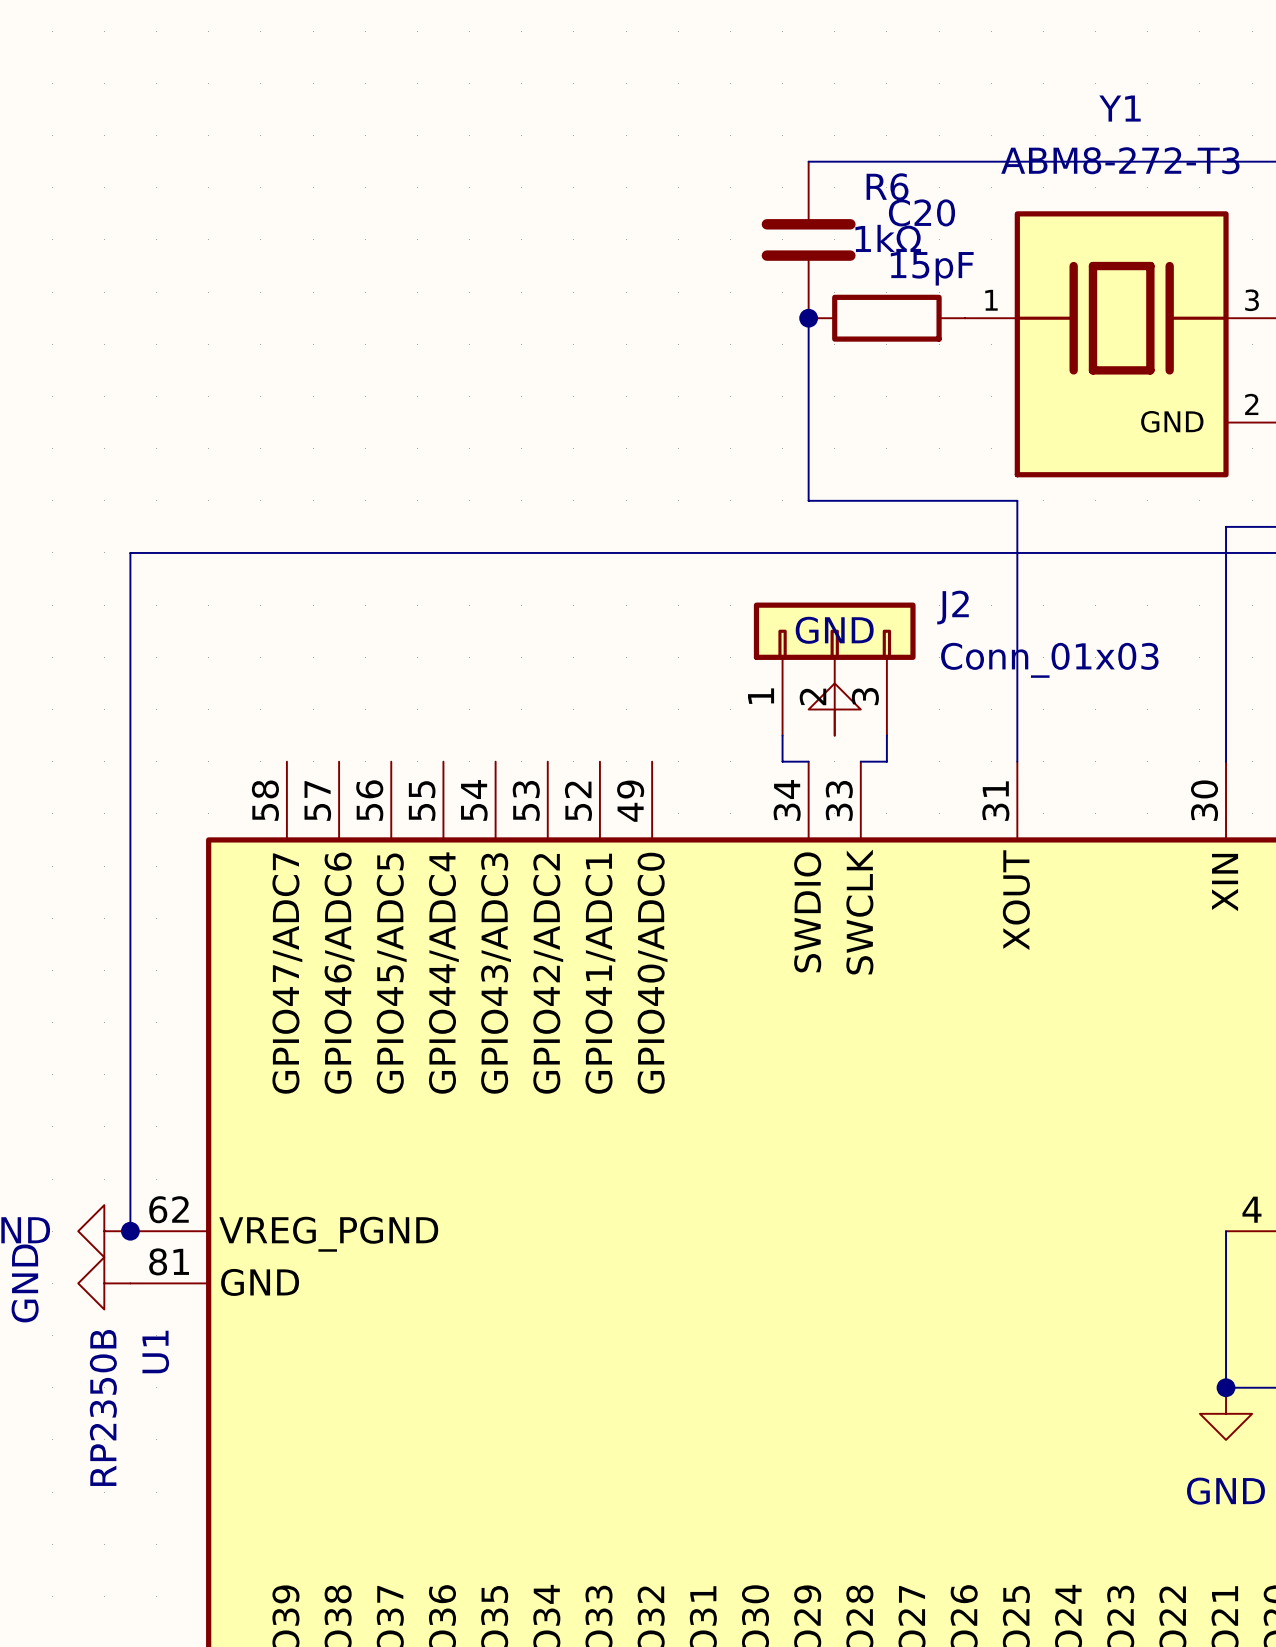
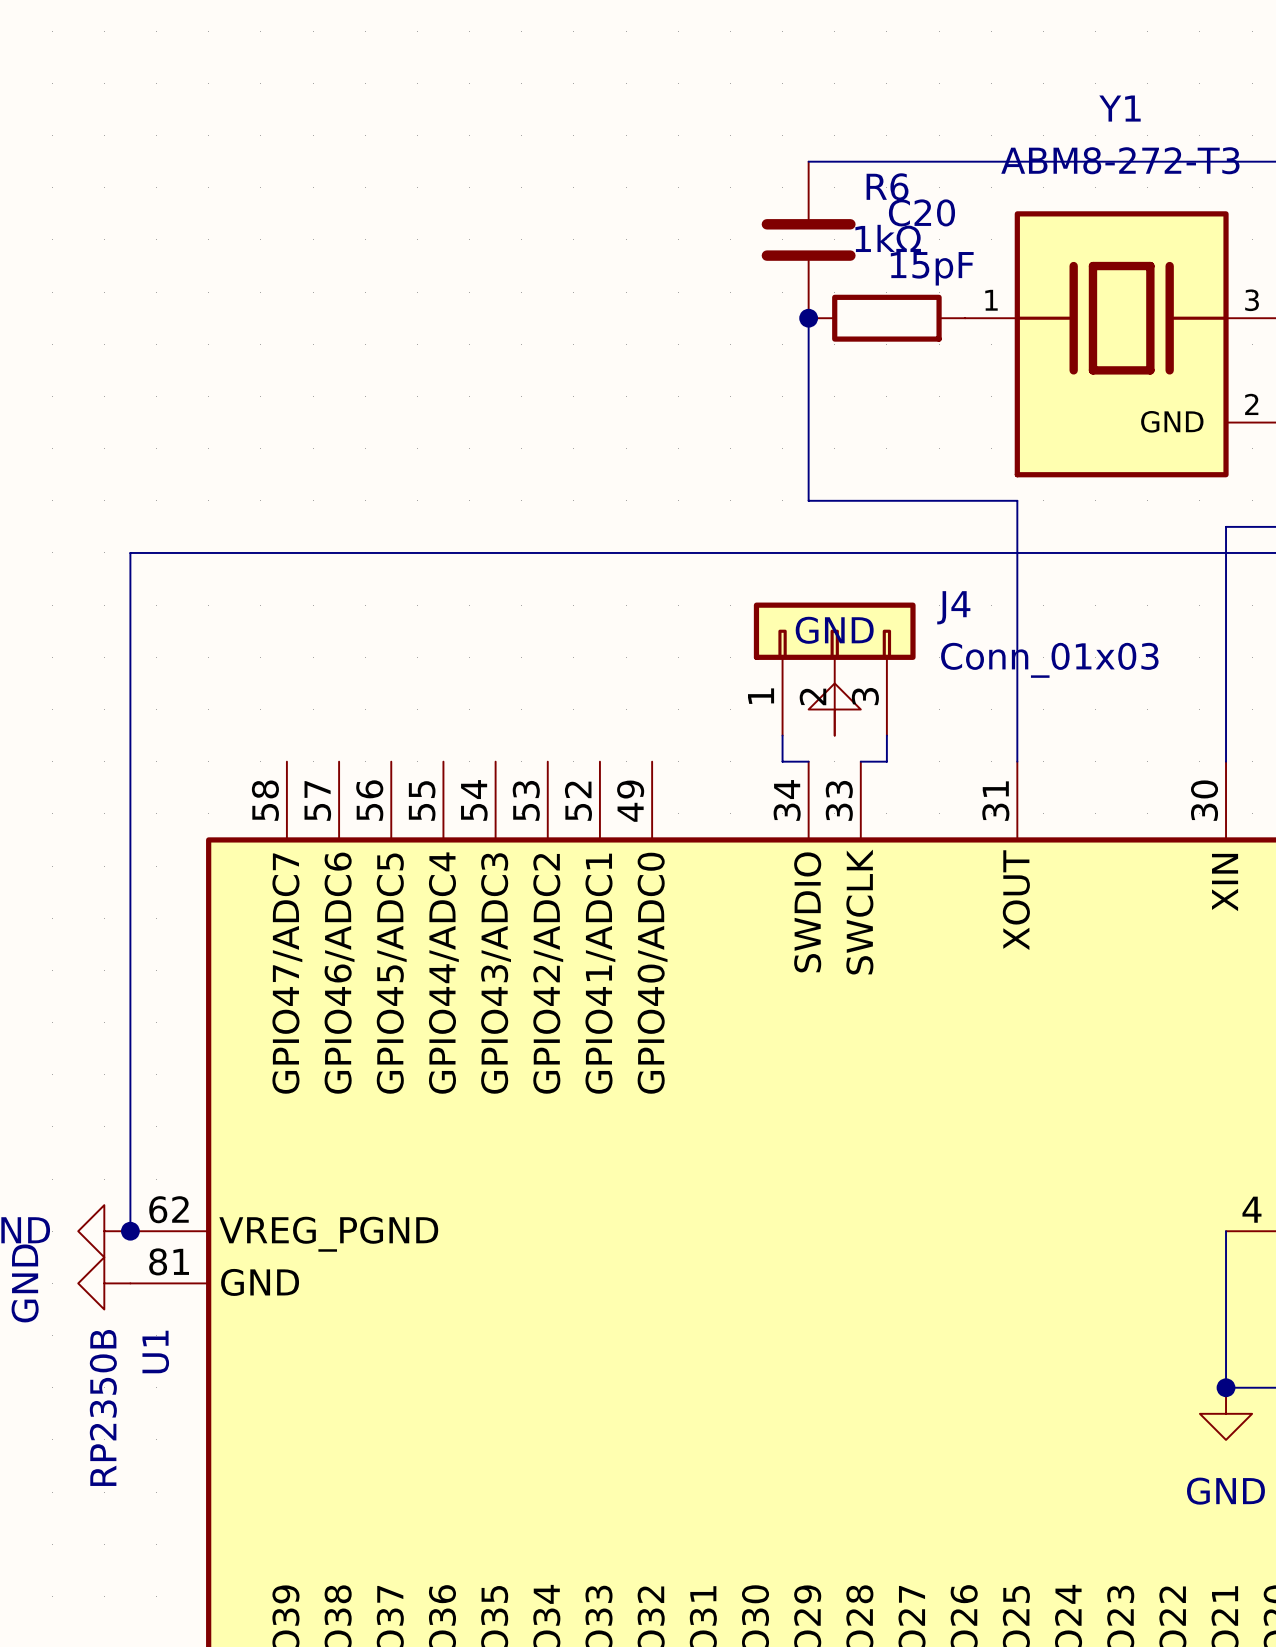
J2 name: J2 (953, 607) -> J4 (953, 607)

